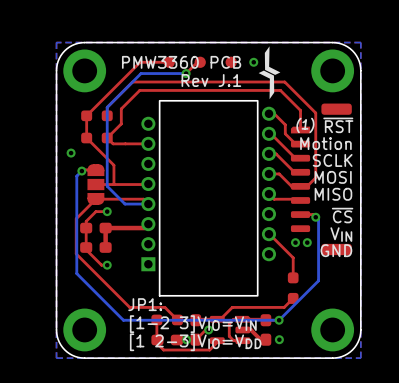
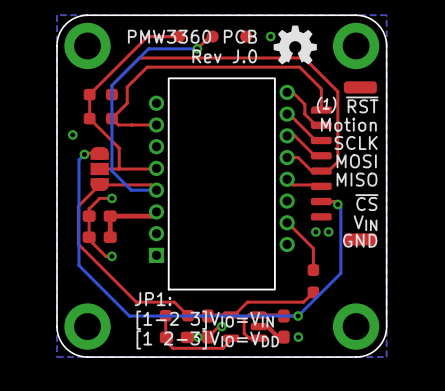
drawing: [258, 46, 281, 100] -> none
drawing: none -> [273, 25, 317, 65]
text: Rev J.1 (211, 80) -> Rev J.0 (224, 56)

